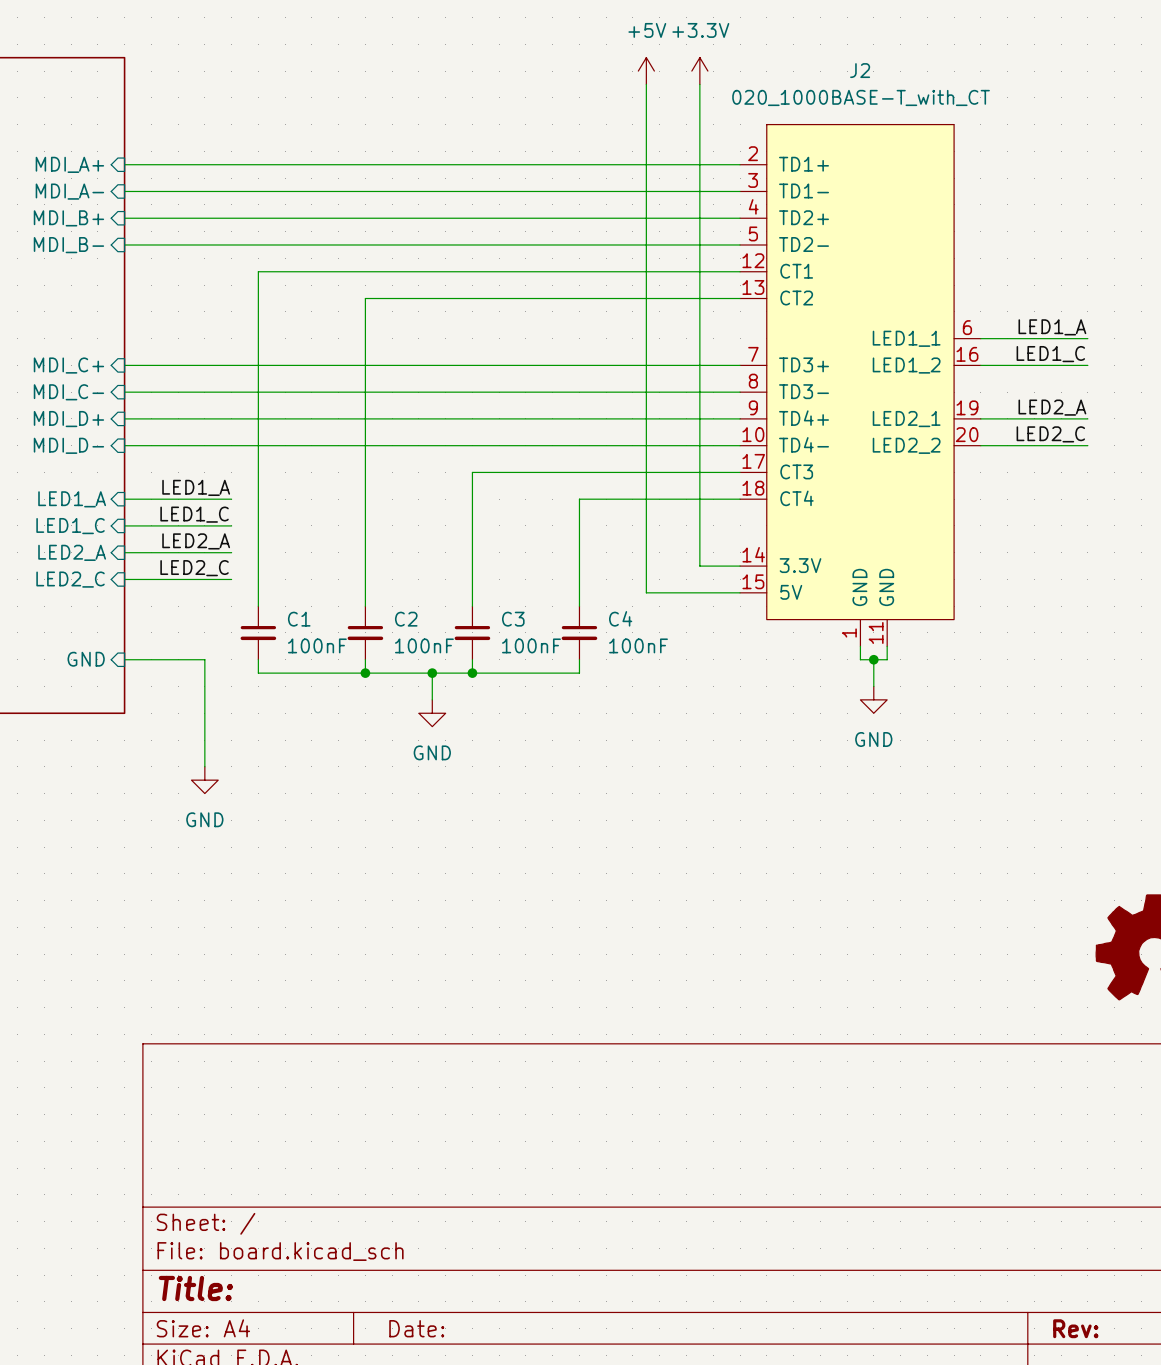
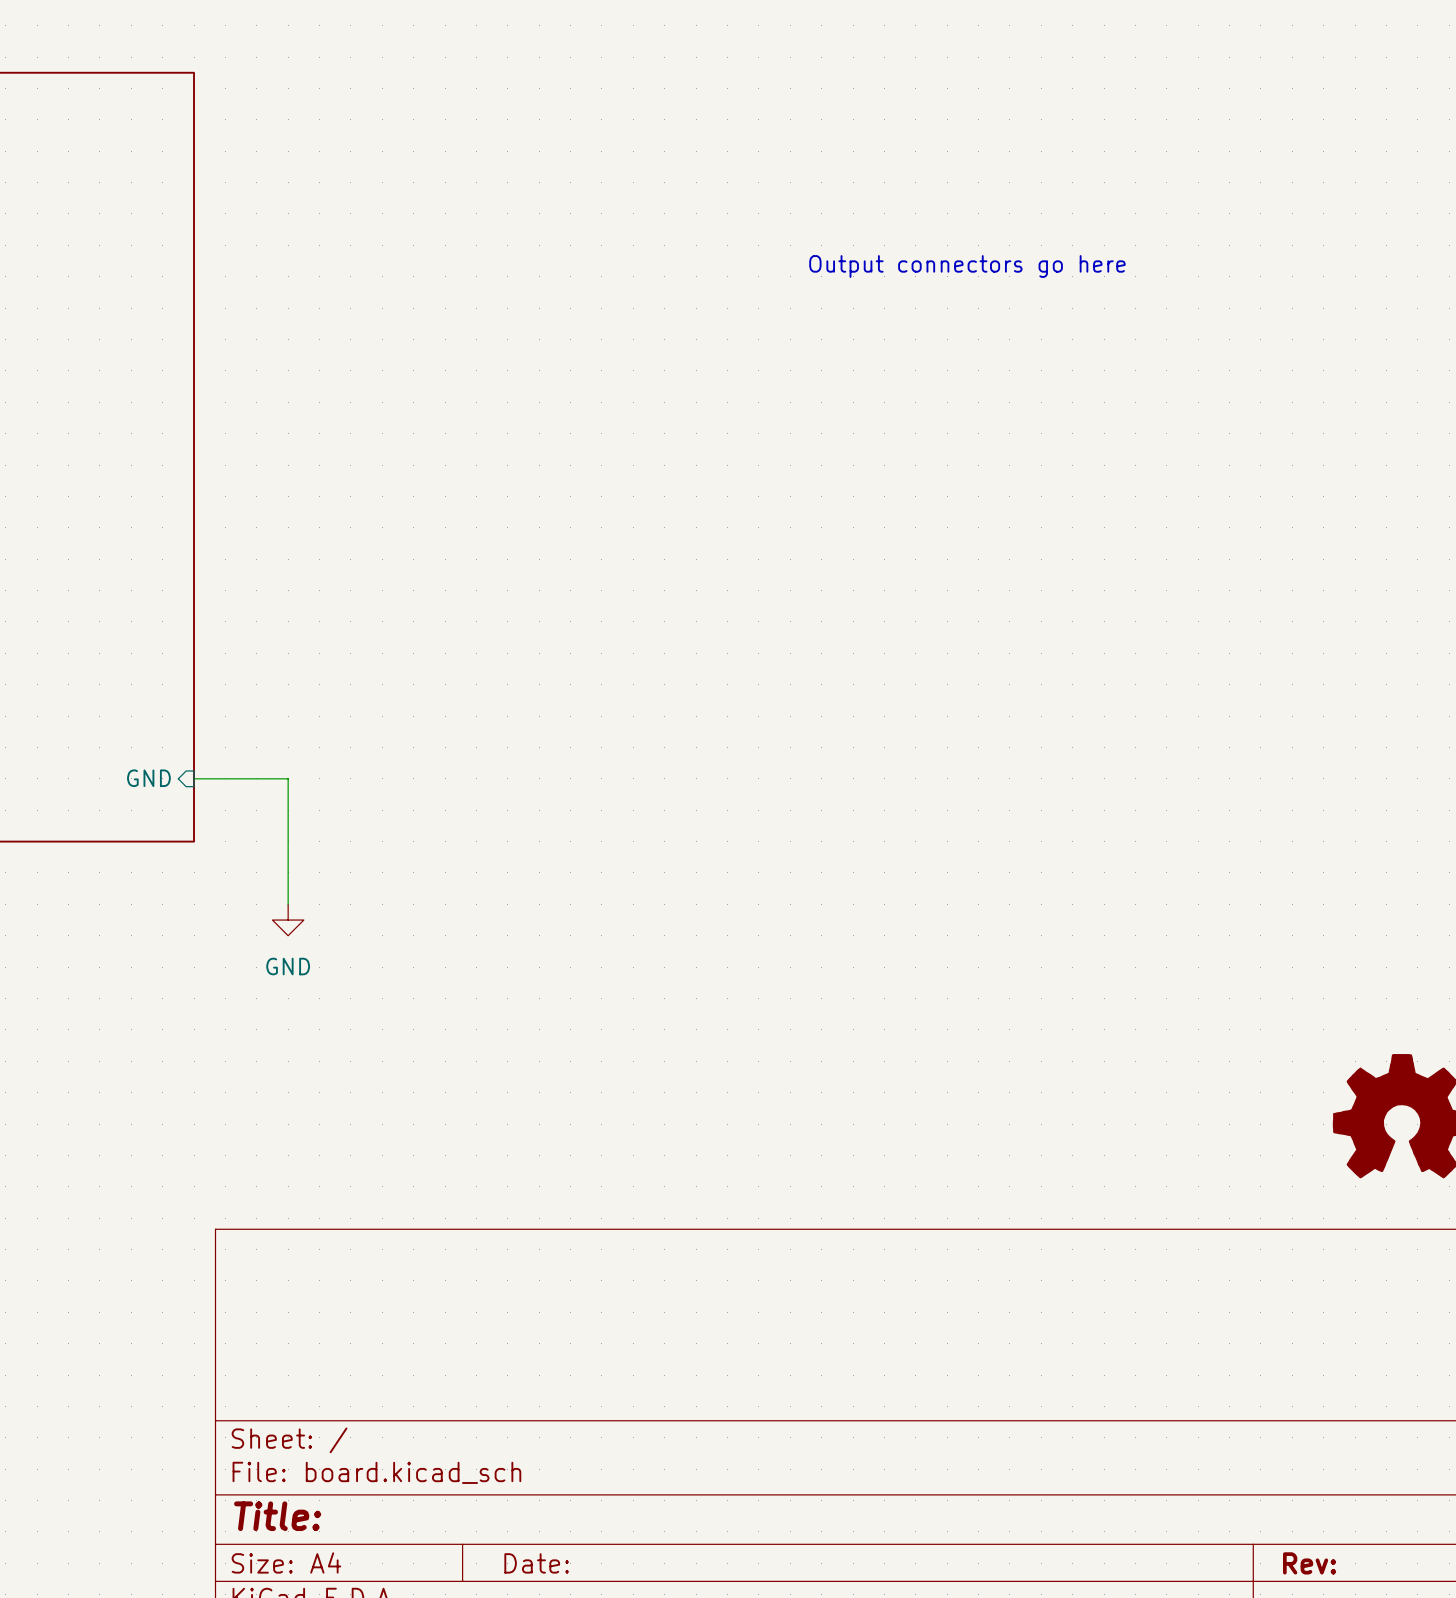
power symbol: +5V (646, 71) -> none
power symbol: +3.3V (699, 71) -> none
wire: (646, 84) (646, 592) (740, 592) -> none
wire: (699, 84) (699, 566) (740, 566) -> none
sheet pin: MDI_A+ (69, 164) -> none
wire: (124, 164) (740, 164) -> none
sheet pin: MDI_A- (69, 191) -> none
wire: (124, 191) (740, 191) -> none
sheet pin: MDI_B+ (68, 218) -> none
wire: (124, 218) (740, 218) -> none
text: none -> Output connectors go here (967, 266)
wire: (124, 244) (740, 244) -> none
sheet pin: MDI_B- (68, 245) -> none
wire: (740, 271) (258, 271) (258, 606) -> none
wire: (740, 298) (365, 298) (365, 606) -> none
label: LED1_A (1052, 327) -> none
wire: (980, 338) (1087, 338) -> none
label: LED1_C (1050, 354) -> none
sheet pin: MDI_C+ (68, 365) -> none
wire: (124, 365) (740, 365) -> none
wire: (980, 365) (1087, 365) -> none
J2: 020_1000BASE-T_with_CT (860, 385) -> none
sheet pin: MDI_C- (68, 392) -> none
wire: (124, 392) (740, 392) -> none
label: LED2_A (1052, 407) -> none
wire: (124, 418) (740, 418) -> none
wire: (980, 418) (1087, 418) -> none
sheet pin: MDI_D+ (68, 419) -> none
label: LED2_C (1050, 434) -> none
sheet pin: MDI_D- (68, 445) -> none
wire: (124, 445) (740, 445) -> none
wire: (980, 445) (1087, 445) -> none
wire: (740, 472) (472, 472) (472, 606) -> none
label: LED1_A (196, 487) -> none
sheet pin: LED1_A (72, 499) -> none
wire: (124, 499) (231, 499) -> none
wire: (740, 499) (579, 499) (579, 606) -> none
label: LED1_C (194, 514) -> none
wire: (124, 525) (231, 525) -> none
sheet pin: LED1_C (70, 526) -> none
label: LED2_A (196, 541) -> none
sheet pin: LED2_A (72, 552) -> none
wire: (124, 552) (231, 552) -> none
label: LED2_C (194, 568) -> none
sheet pin: LED2_C (70, 579) -> none
wire: (124, 579) (231, 579) -> none
C1: 100nF (258, 632) -> none
C2: 100nF (365, 632) -> none
C3: 100nF (472, 632) -> none
C4: 100nF (579, 632) -> none
wire: (860, 646) (860, 659) (887, 659) (887, 646) -> none
wire: (258, 659) (258, 673) (579, 673) (579, 659) -> none
wire: (365, 659) (365, 673) -> none
wire: (472, 659) (472, 673) -> none
wire: (873, 659) (873, 686) -> none
junction: (873, 659) -> none
junction: (365, 673) -> none
wire: (432, 673) (432, 699) -> none
junction: (432, 673) -> none
junction: (472, 673) -> none
power symbol: GND (873, 699) -> none
power symbol: GND (432, 713) -> none

